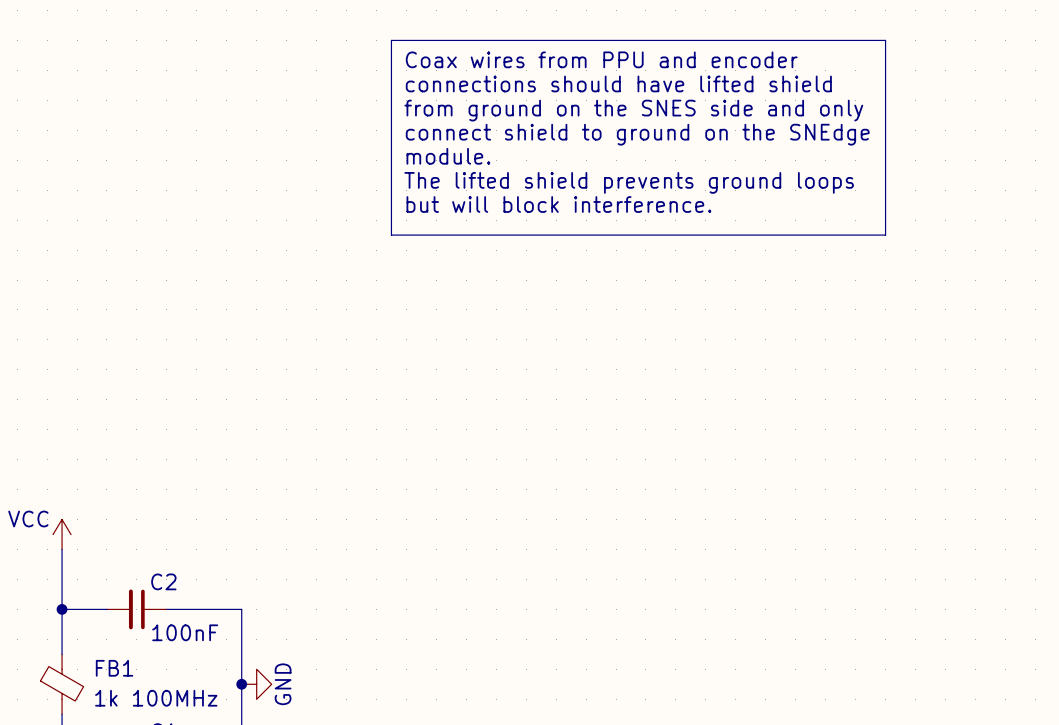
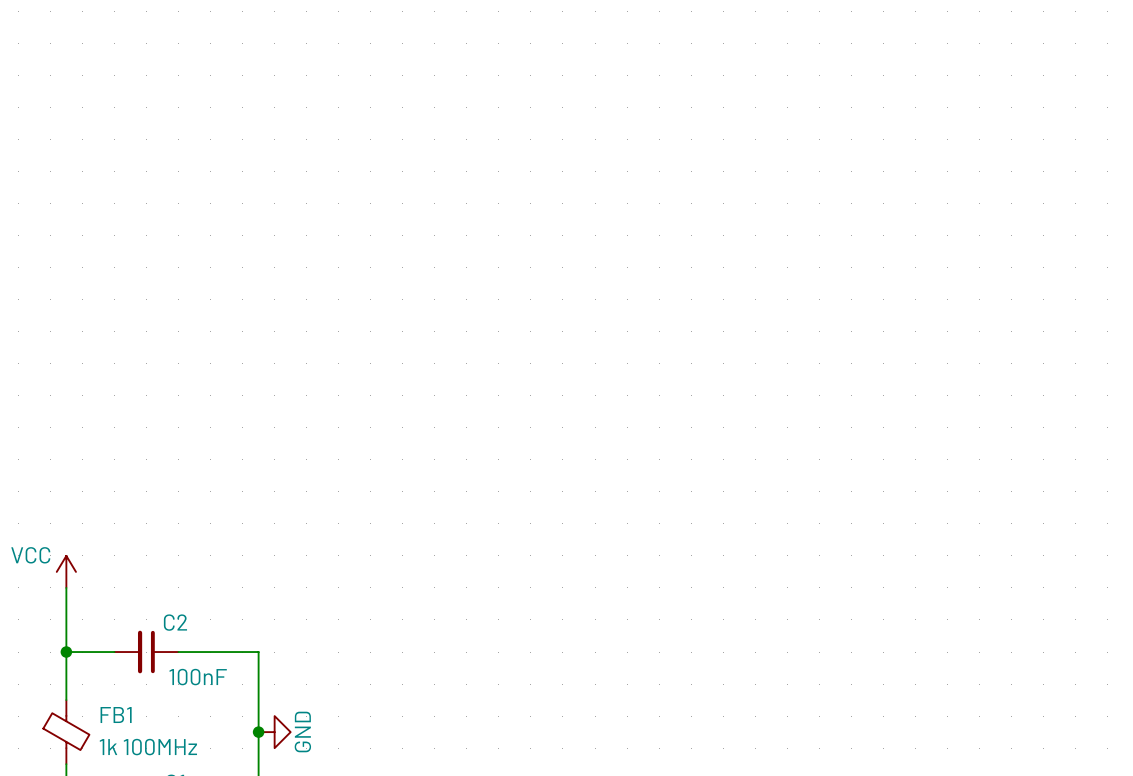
line: (391, 40) (885, 40) (885, 235) (391, 235) (391, 40) -> none
text: Coax wires from PPU and encoder (601, 59) -> none
text: connections should have lifted shield (618, 83) -> none
text: from ground on the SNES side and only (633, 110) -> none
text: connect shield to ground on the SNEdge (637, 134) -> none
text: module. (448, 156) -> none
text: The lifted shield prevents ground loops (629, 182) -> none
text: but will block interference. (558, 204) -> none

